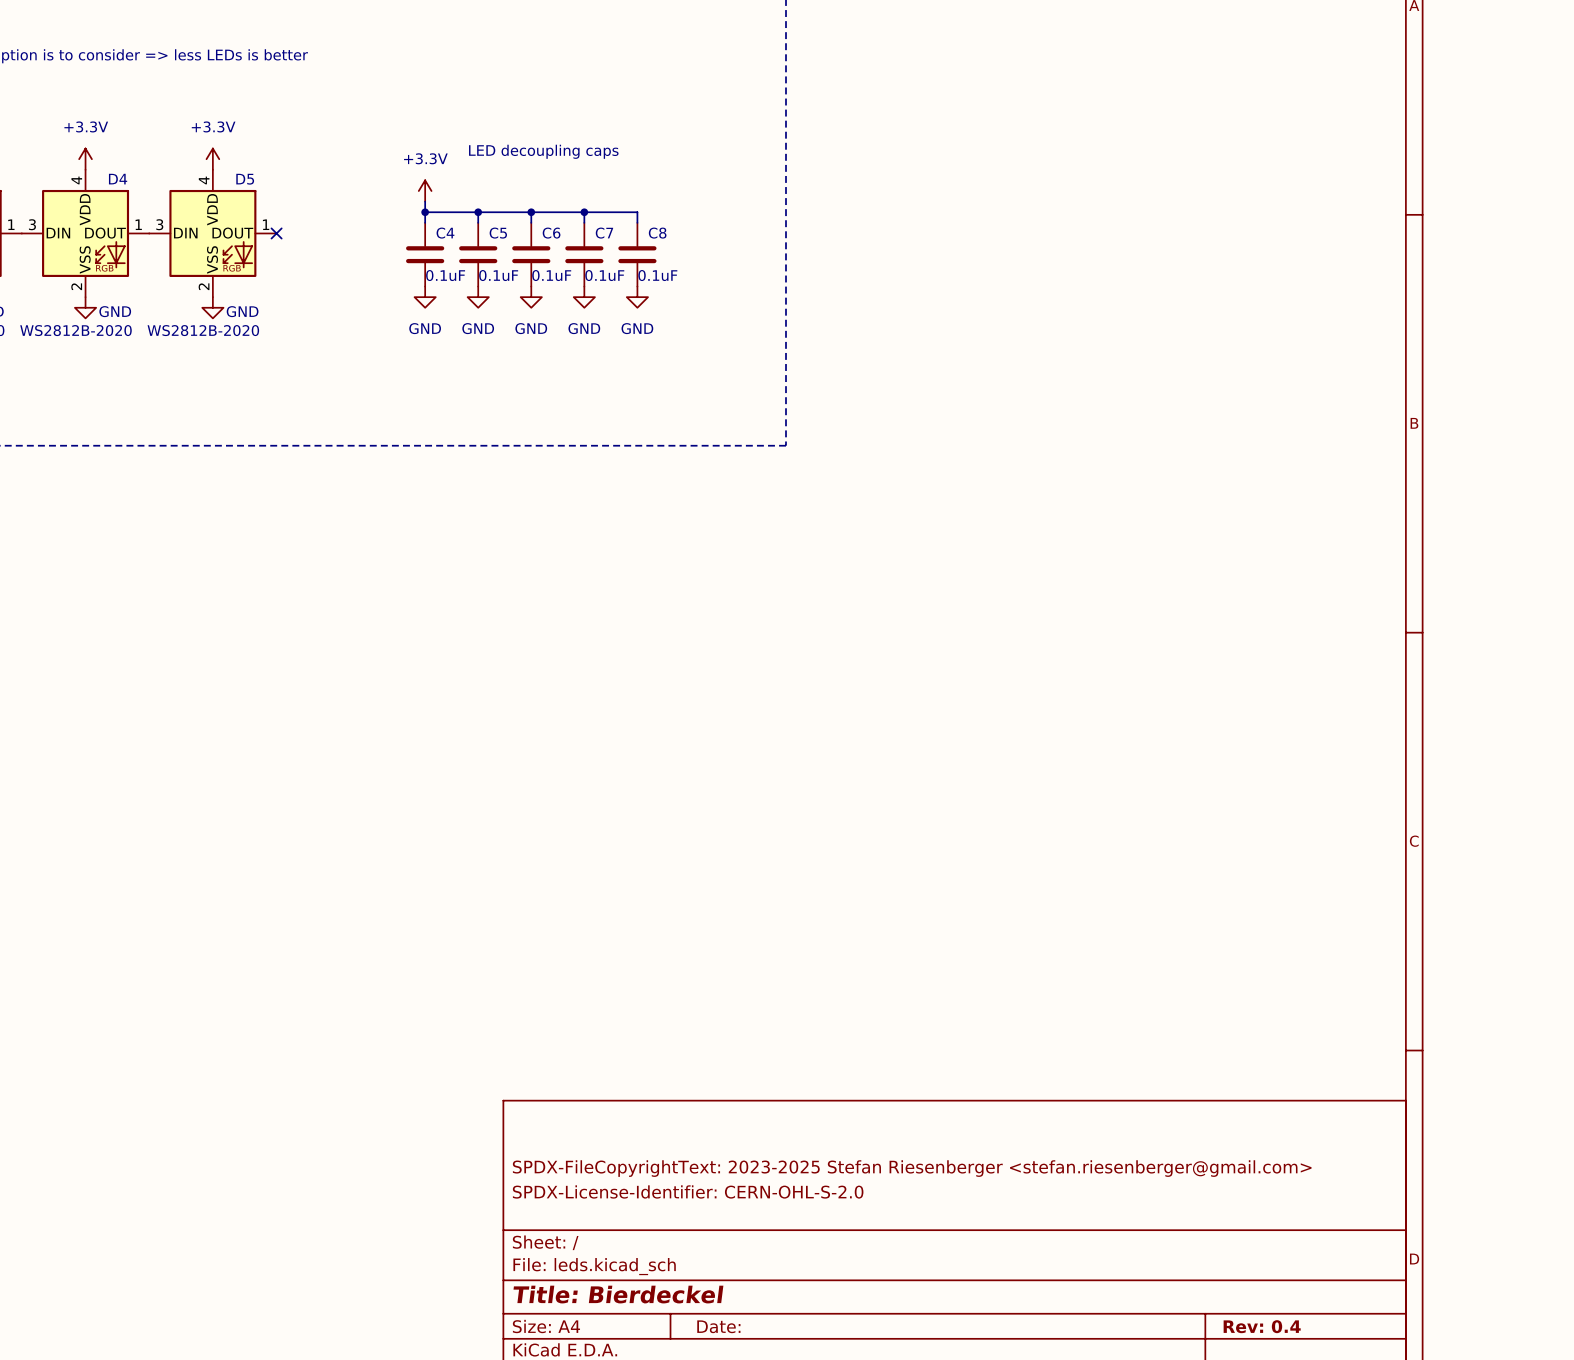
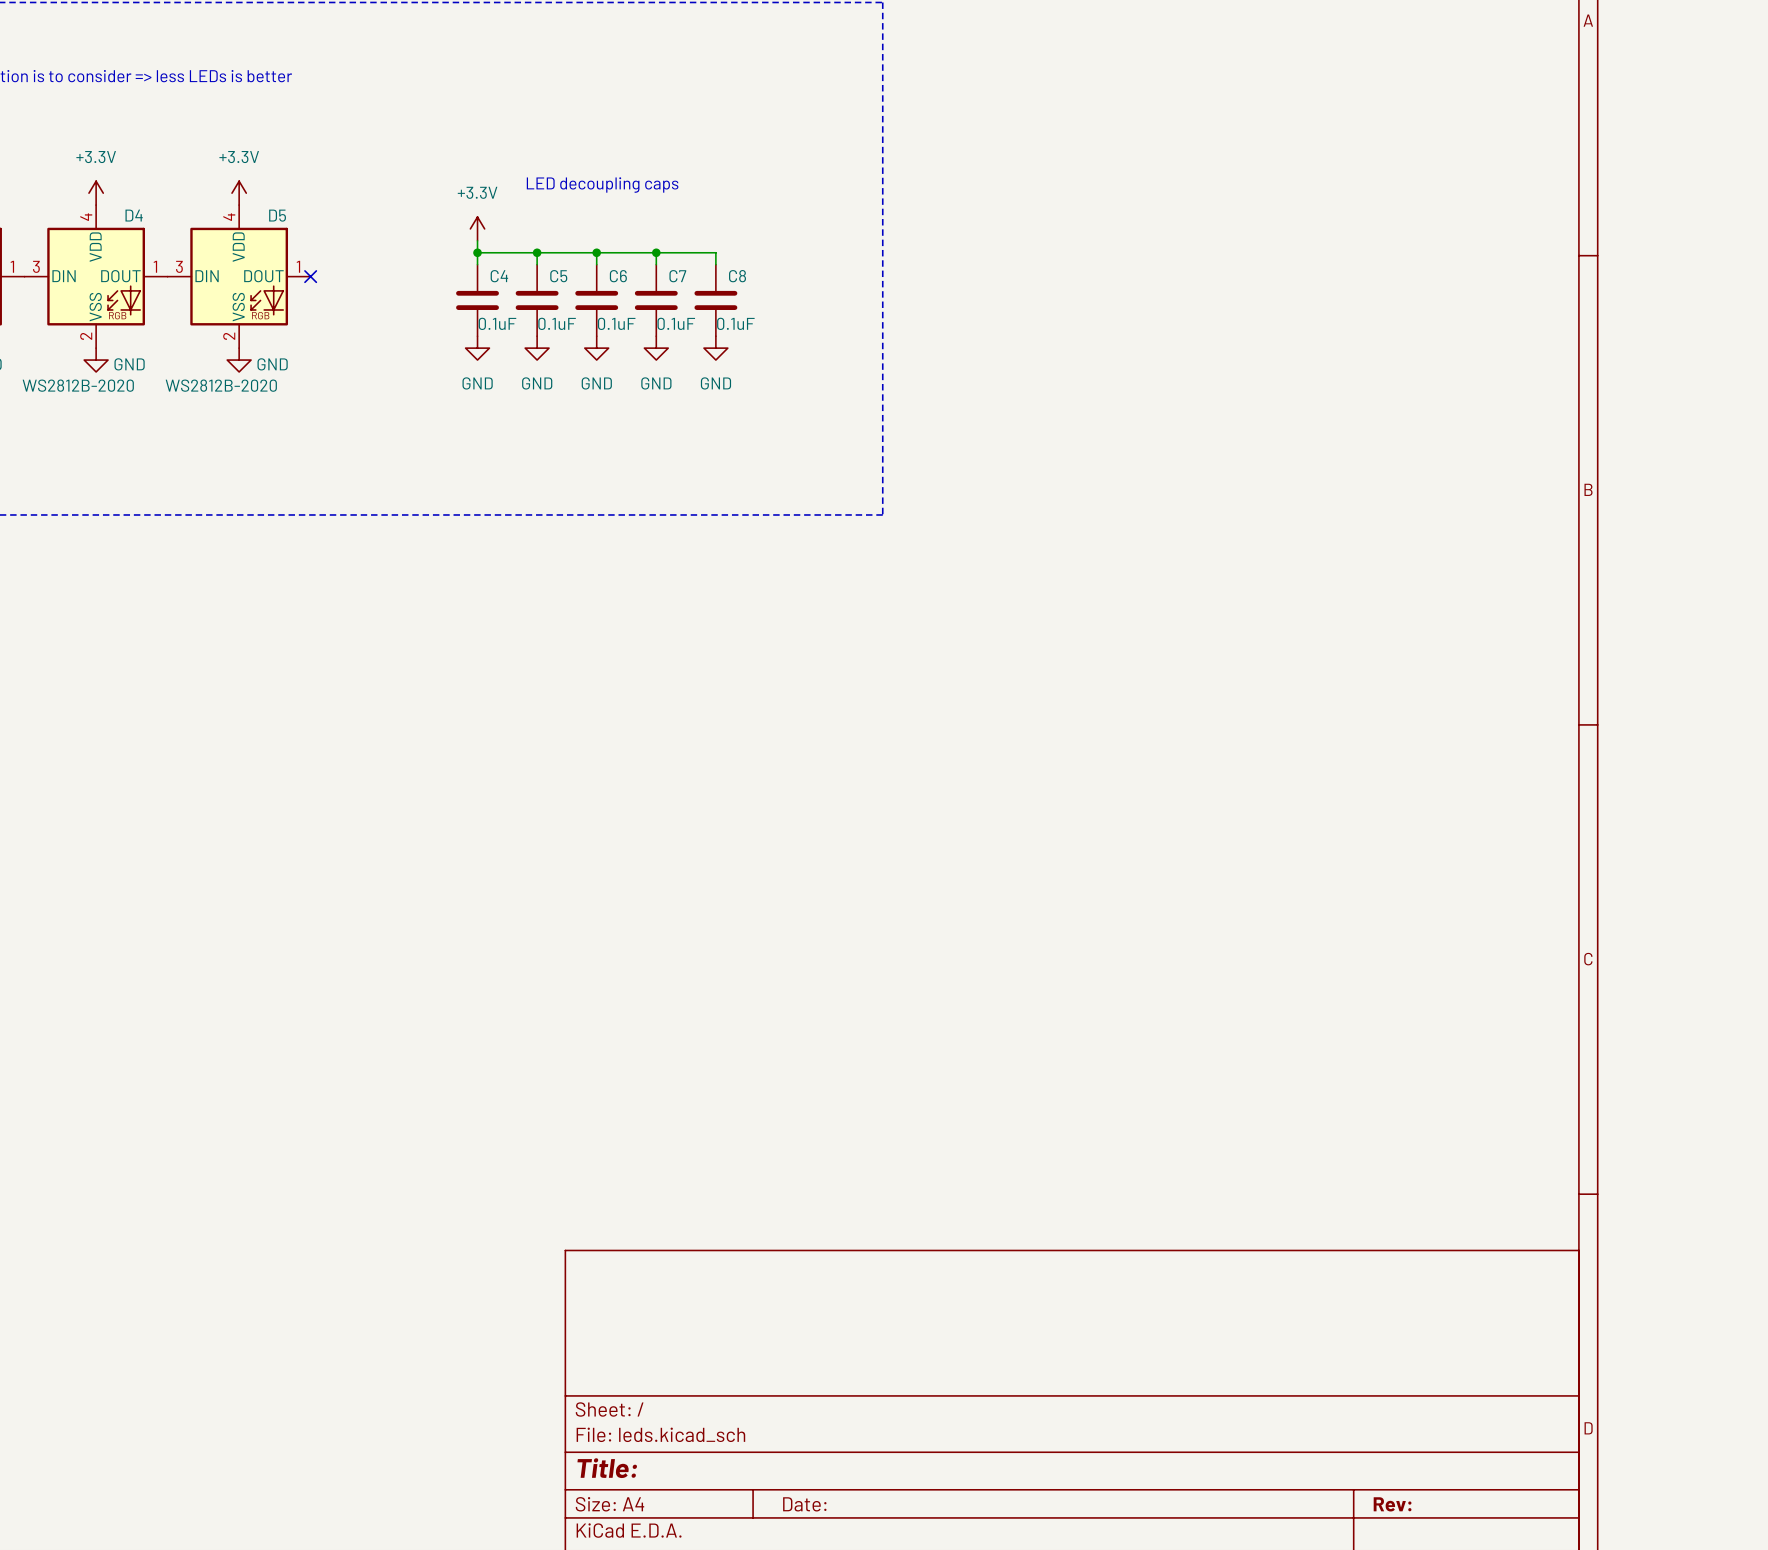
title block: SPDX-FileCopyrightText: 2023-2025 Stefan Riesenberger <stefan.riesenberger@gmail.com> (912, 1168) -> none
title block: SPDX-License-Identifier: CERN-OHL-S-2.0 (688, 1191) -> none
title block: Title: Bierdeckel (618, 1294) -> Title: (607, 1468)
title block: Rev: 0.4 (1262, 1326) -> Rev: (1392, 1504)

